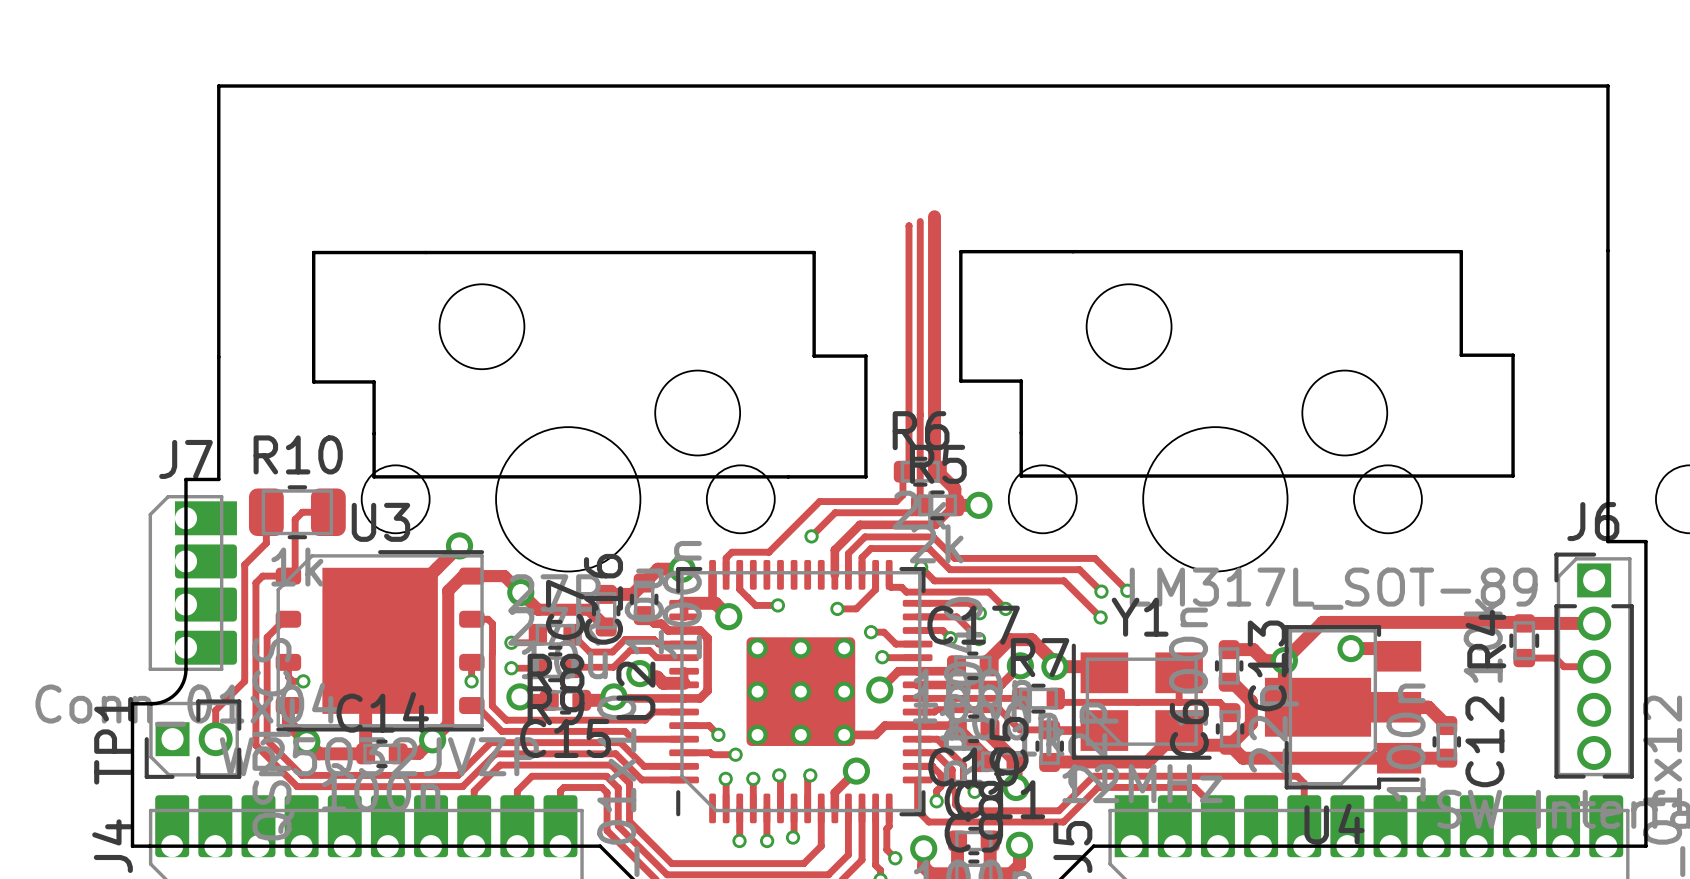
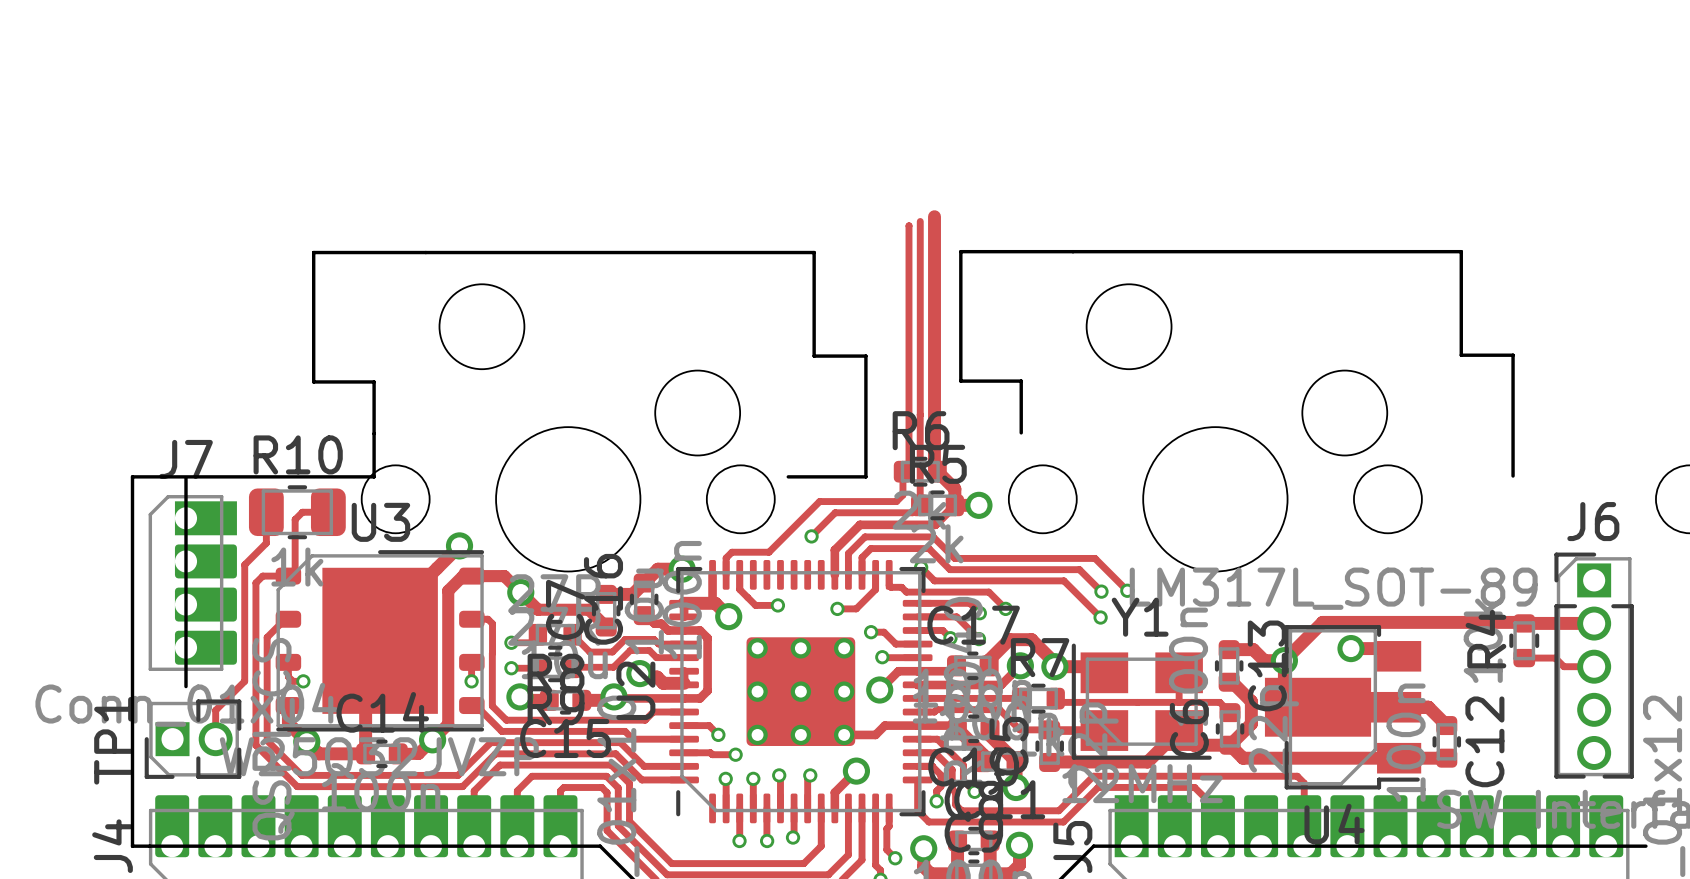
board edge: (1021, 432) (1021, 476) (1513, 476) -> none
board edge: (374, 476) (788, 476) -> (374, 476) (132, 476) (132, 703)
board edge: (185, 479) (218, 479) (218, 86) (1607, 86) (1607, 541) (1645, 541) (1645, 846) -> none
board edge: (185, 669) (181, 686) (168, 699) (155, 703) (132, 703) -> (185, 669) (185, 686)

